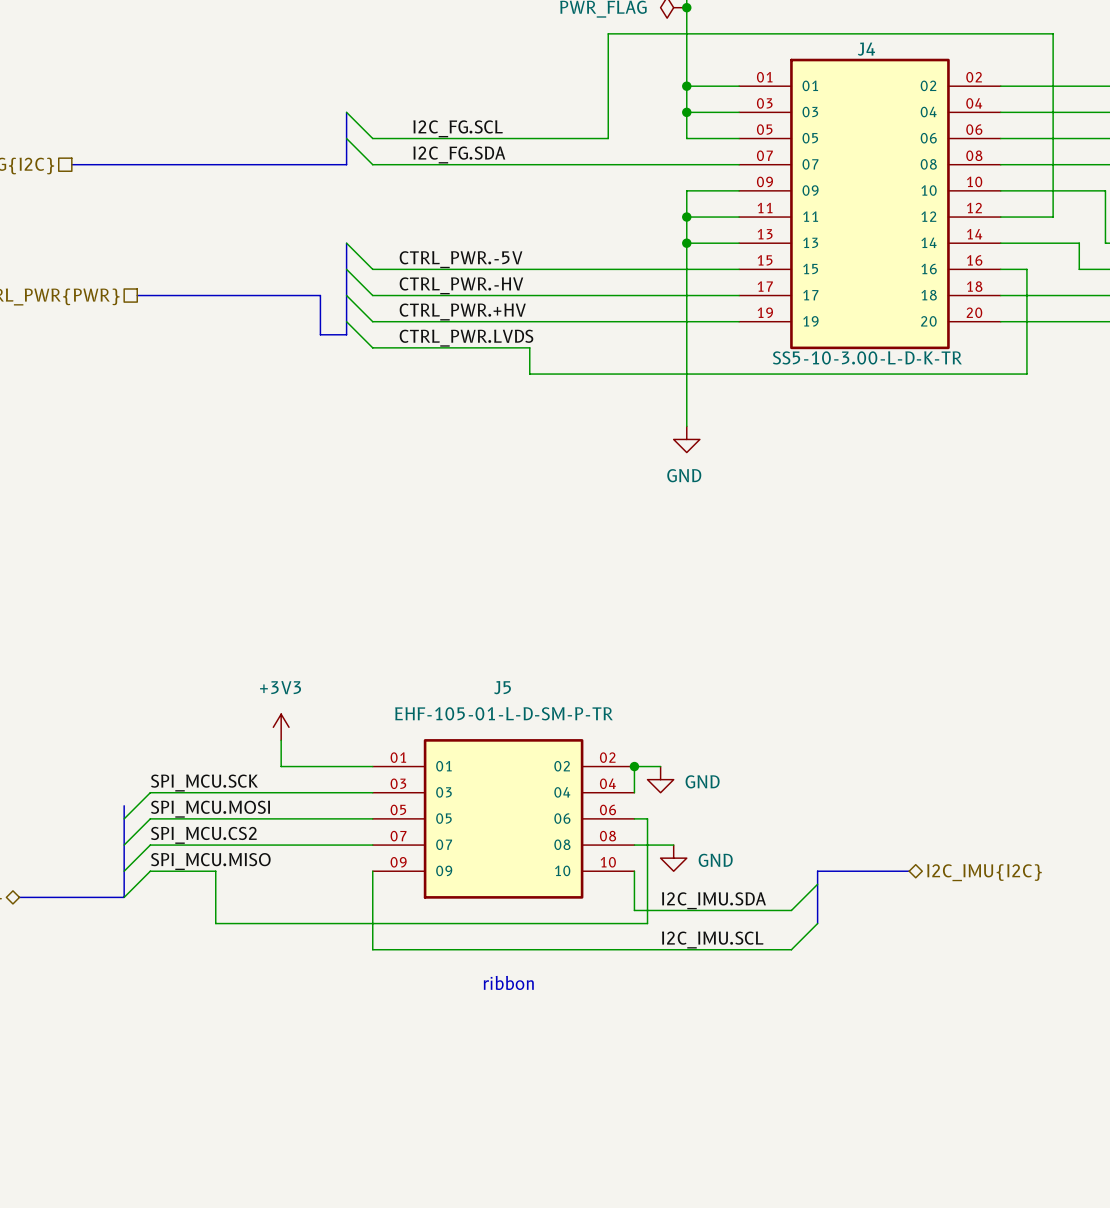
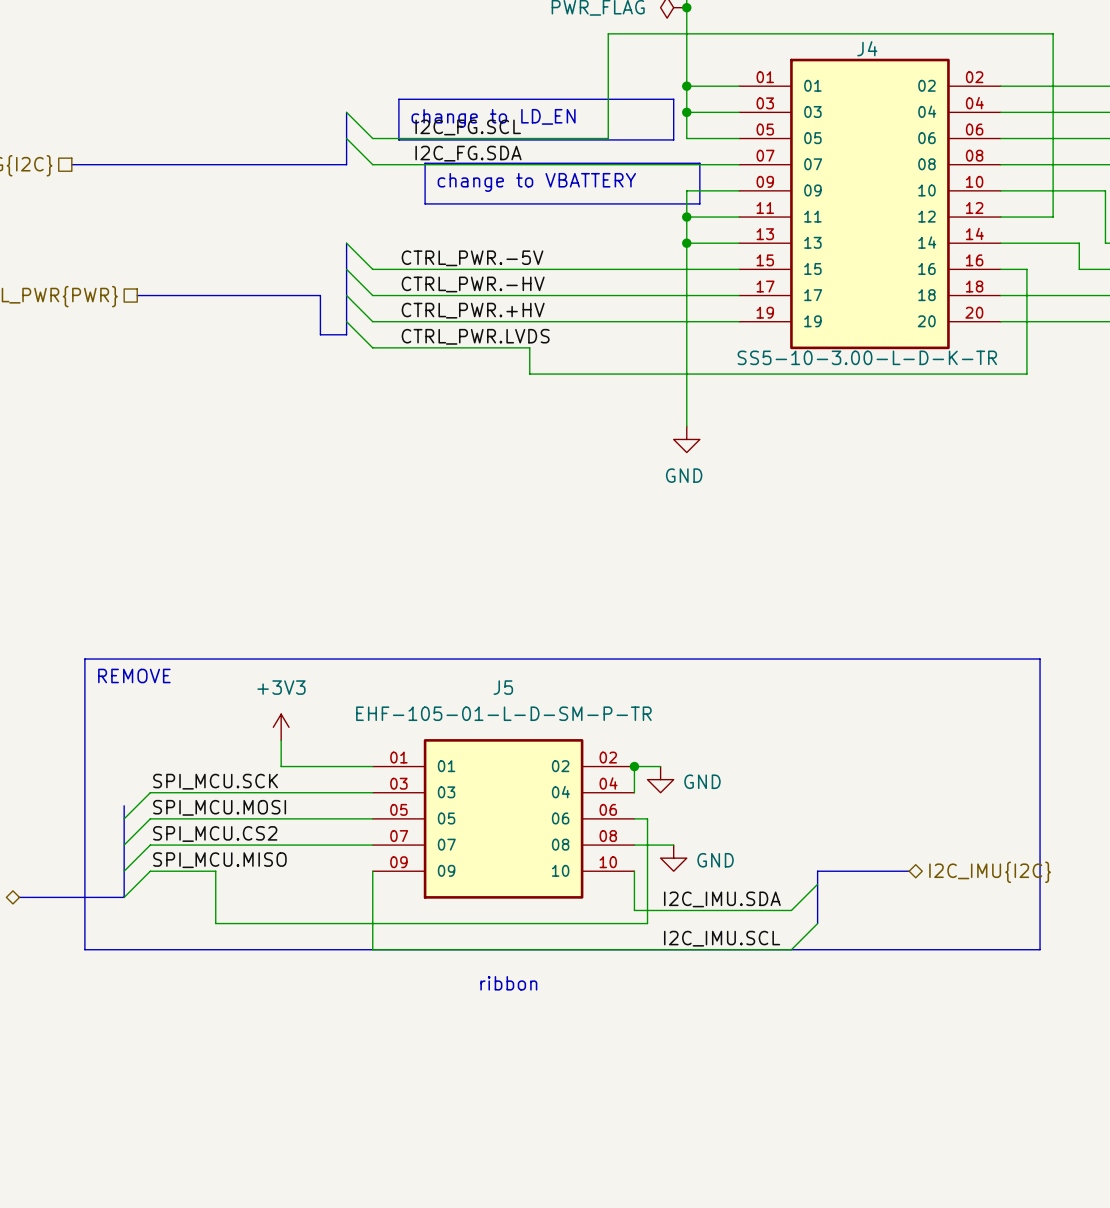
line: none -> (398, 99) (673, 99) (673, 139) (398, 139) (398, 99)
text: none -> change to LD_EN (493, 118)
line: none -> (425, 163) (699, 163) (699, 203) (425, 203) (425, 163)
text: none -> change to VBATTERY (536, 182)
line: none -> (84, 659) (1040, 659) (1040, 949) (84, 949) (84, 659)
text: none -> REMOVE (134, 675)

